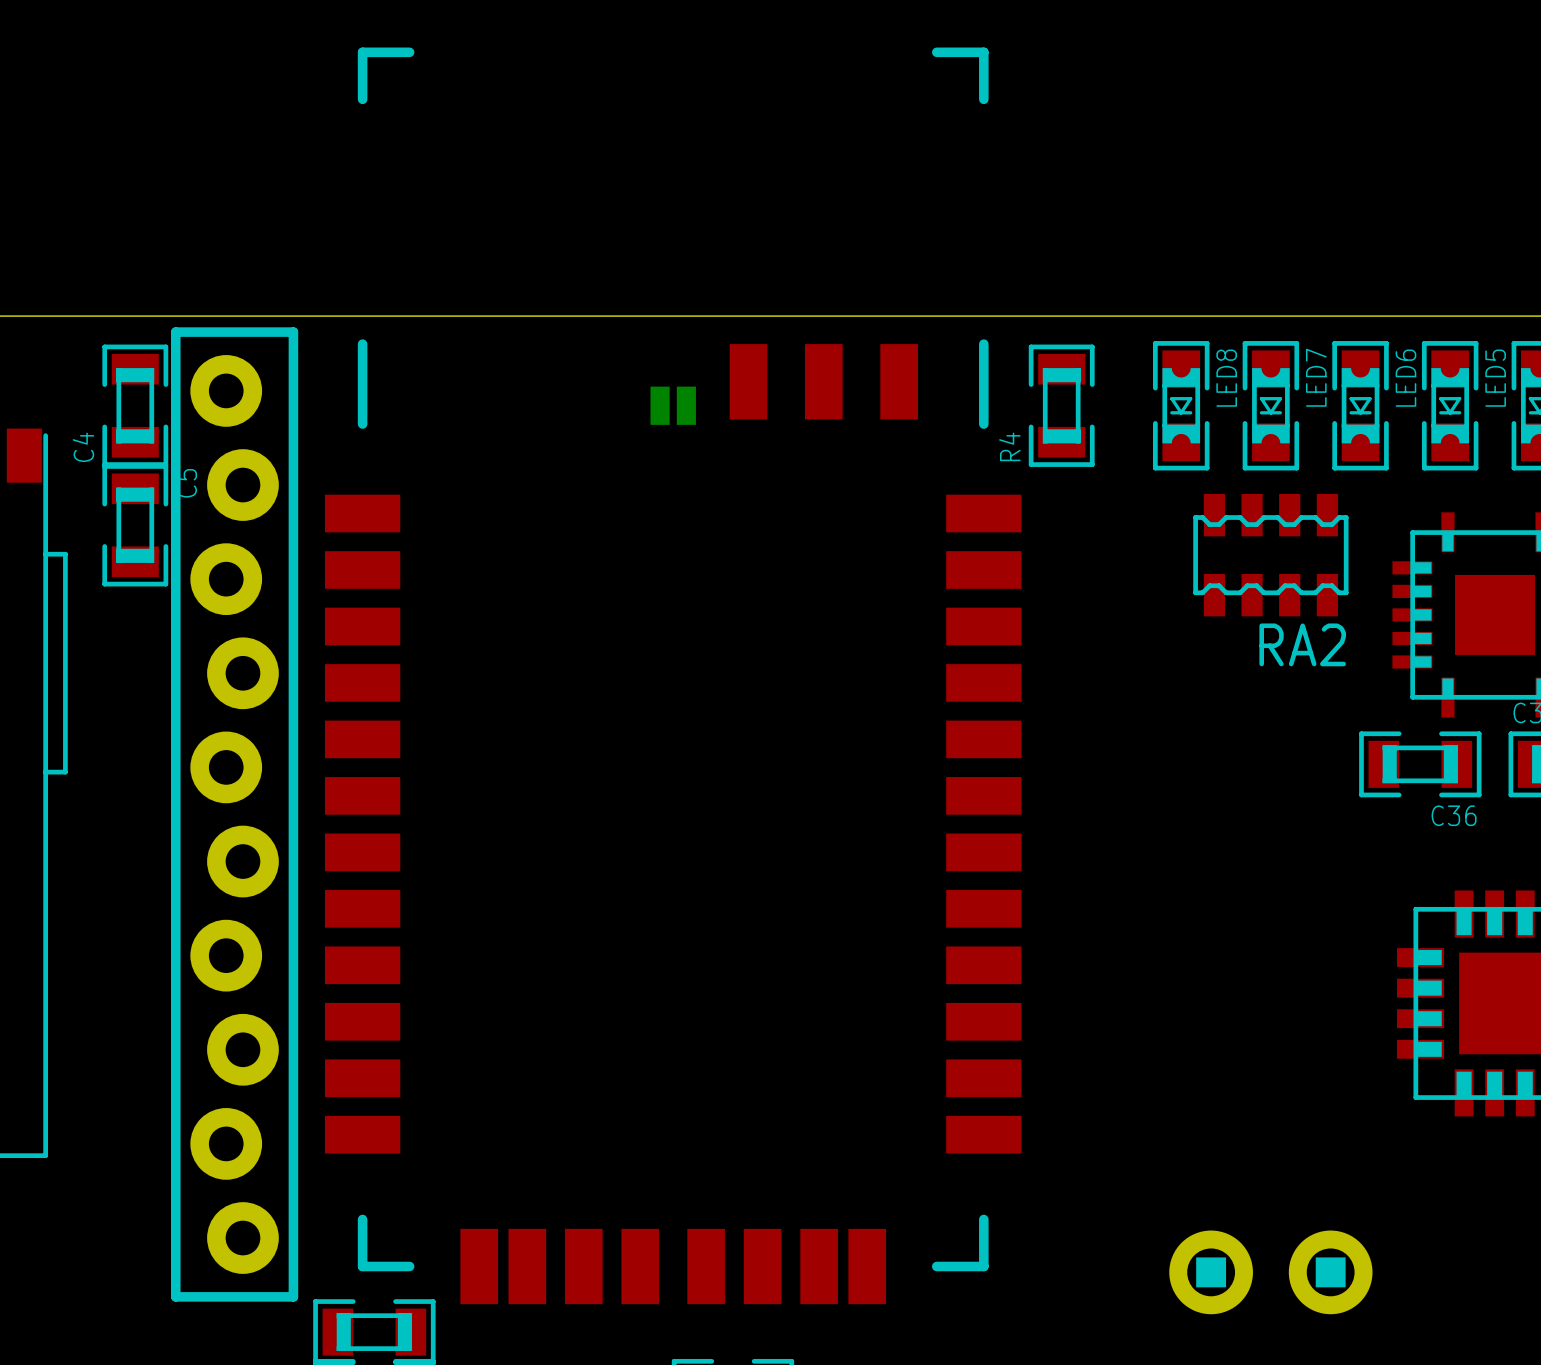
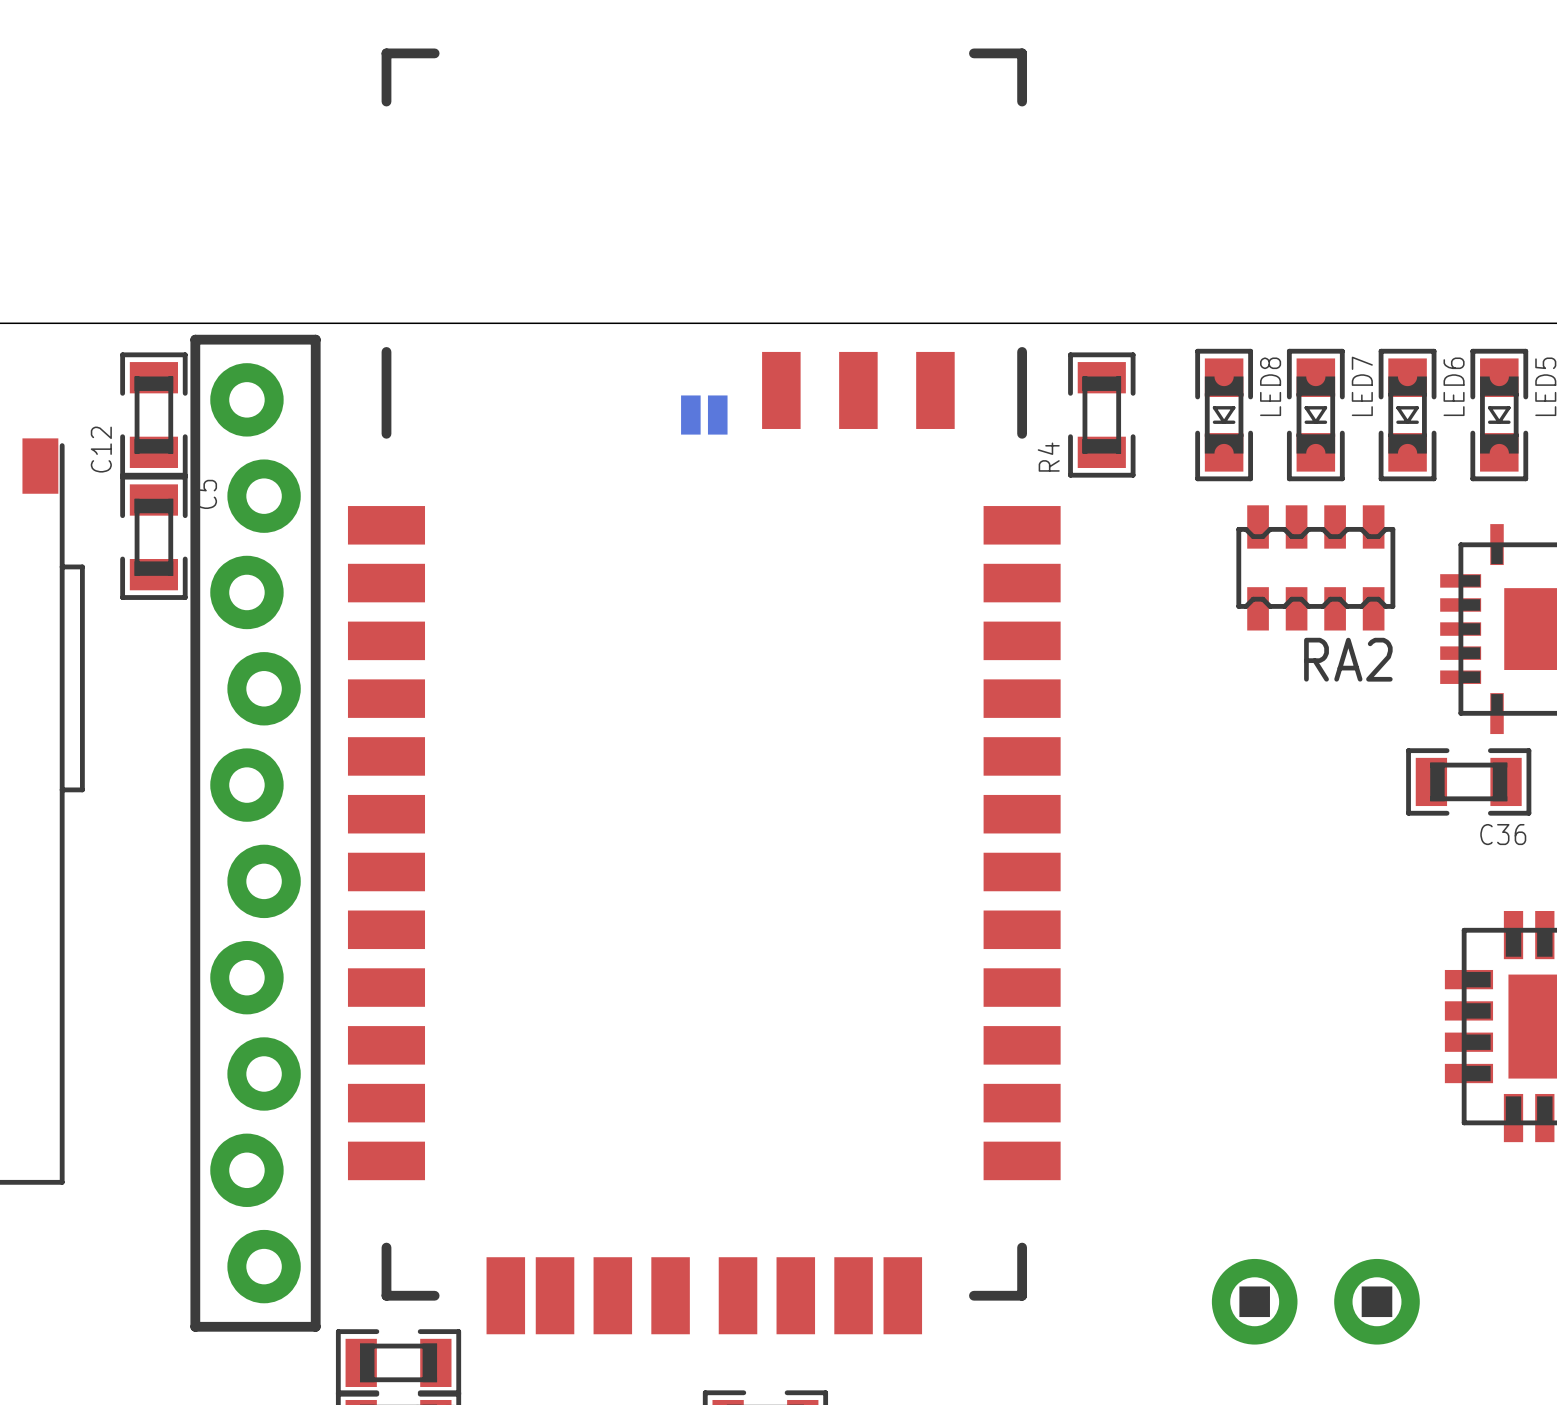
C4 name: C4 (83, 447) -> C12 (101, 449)

